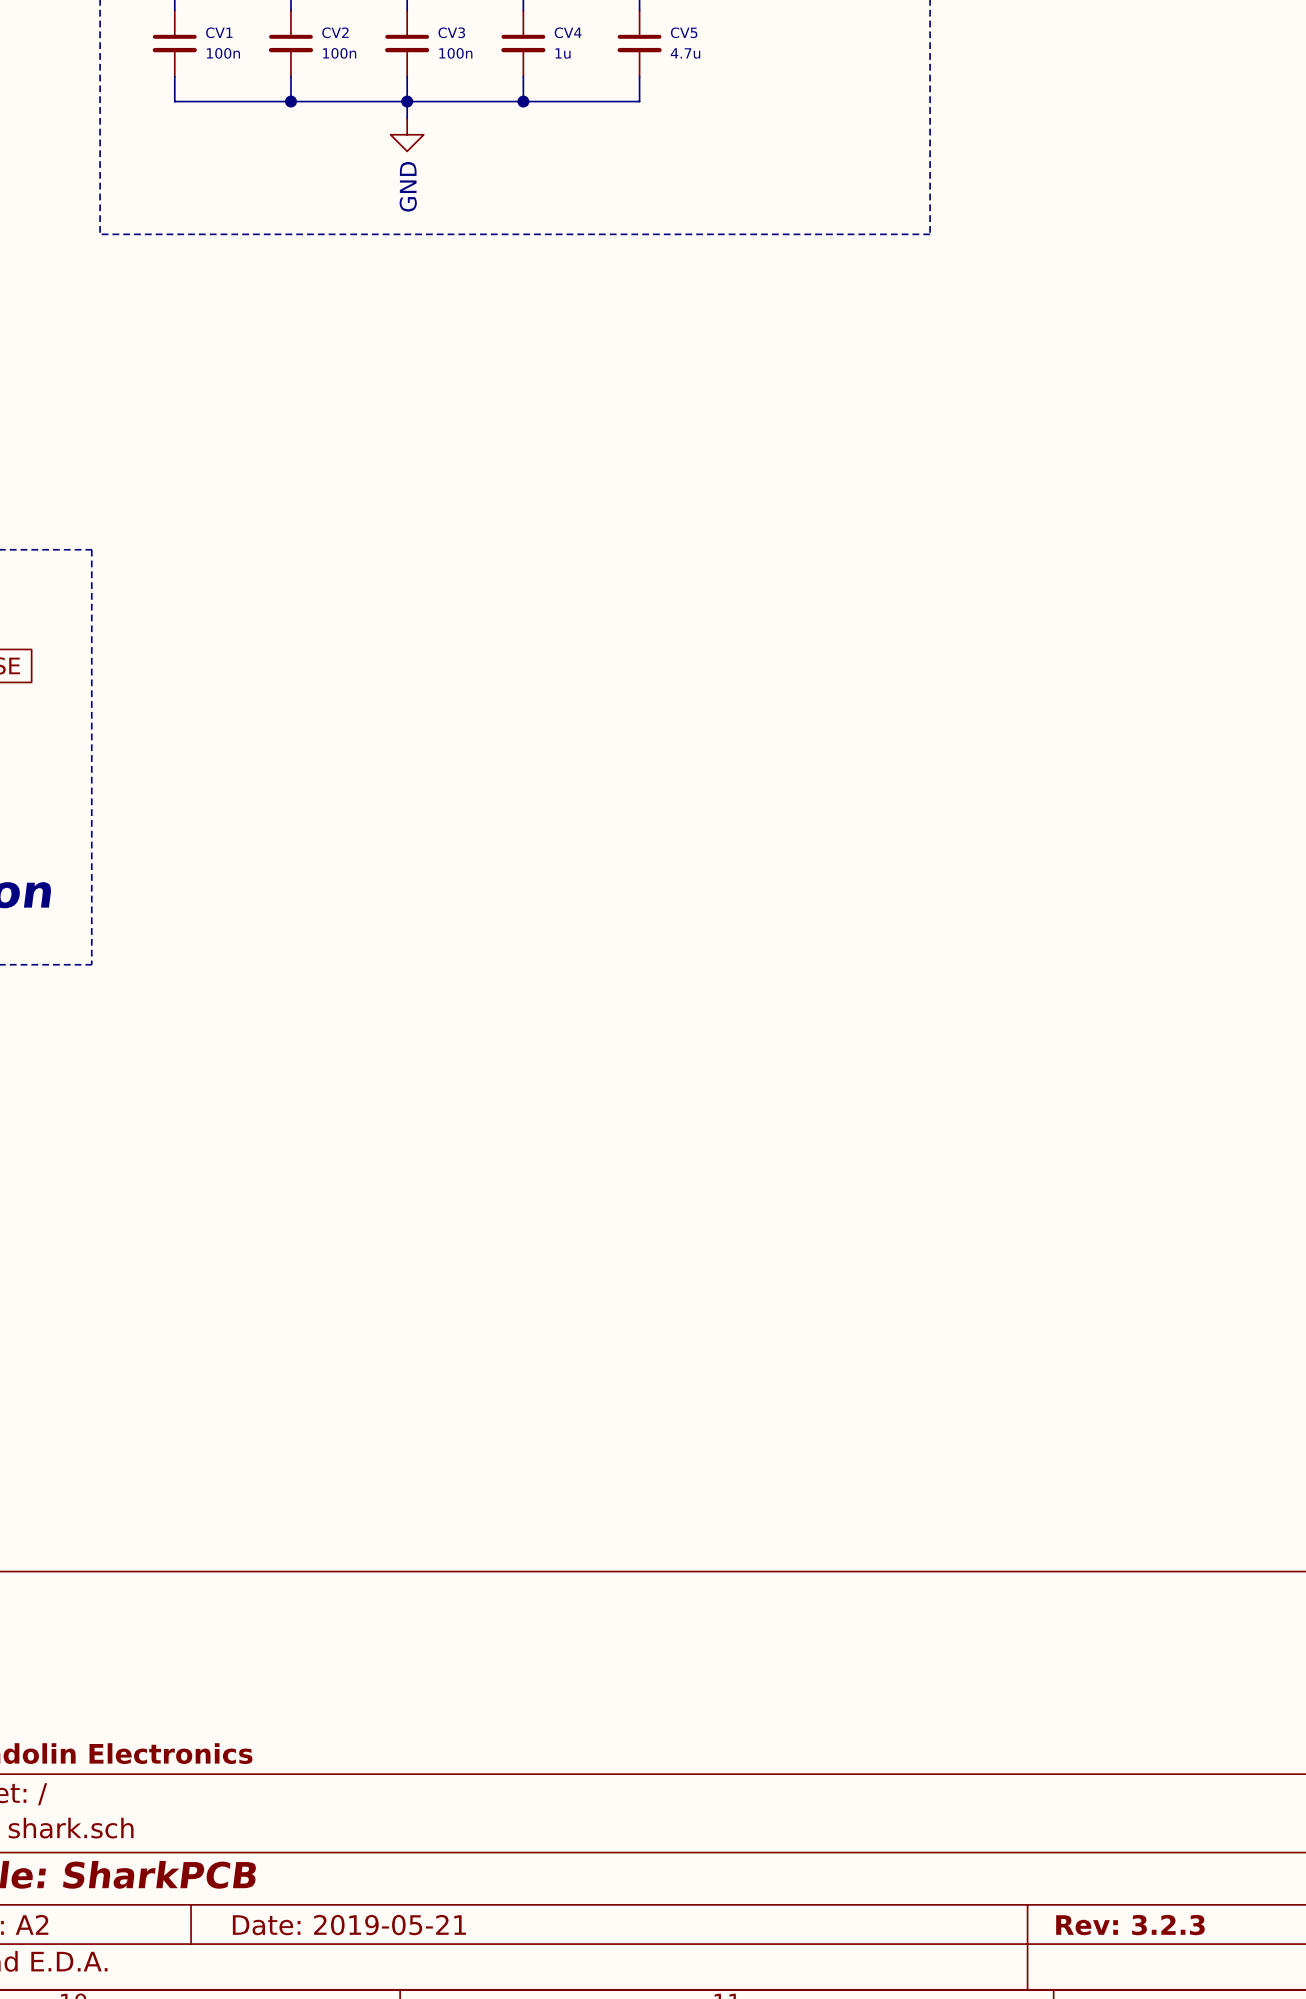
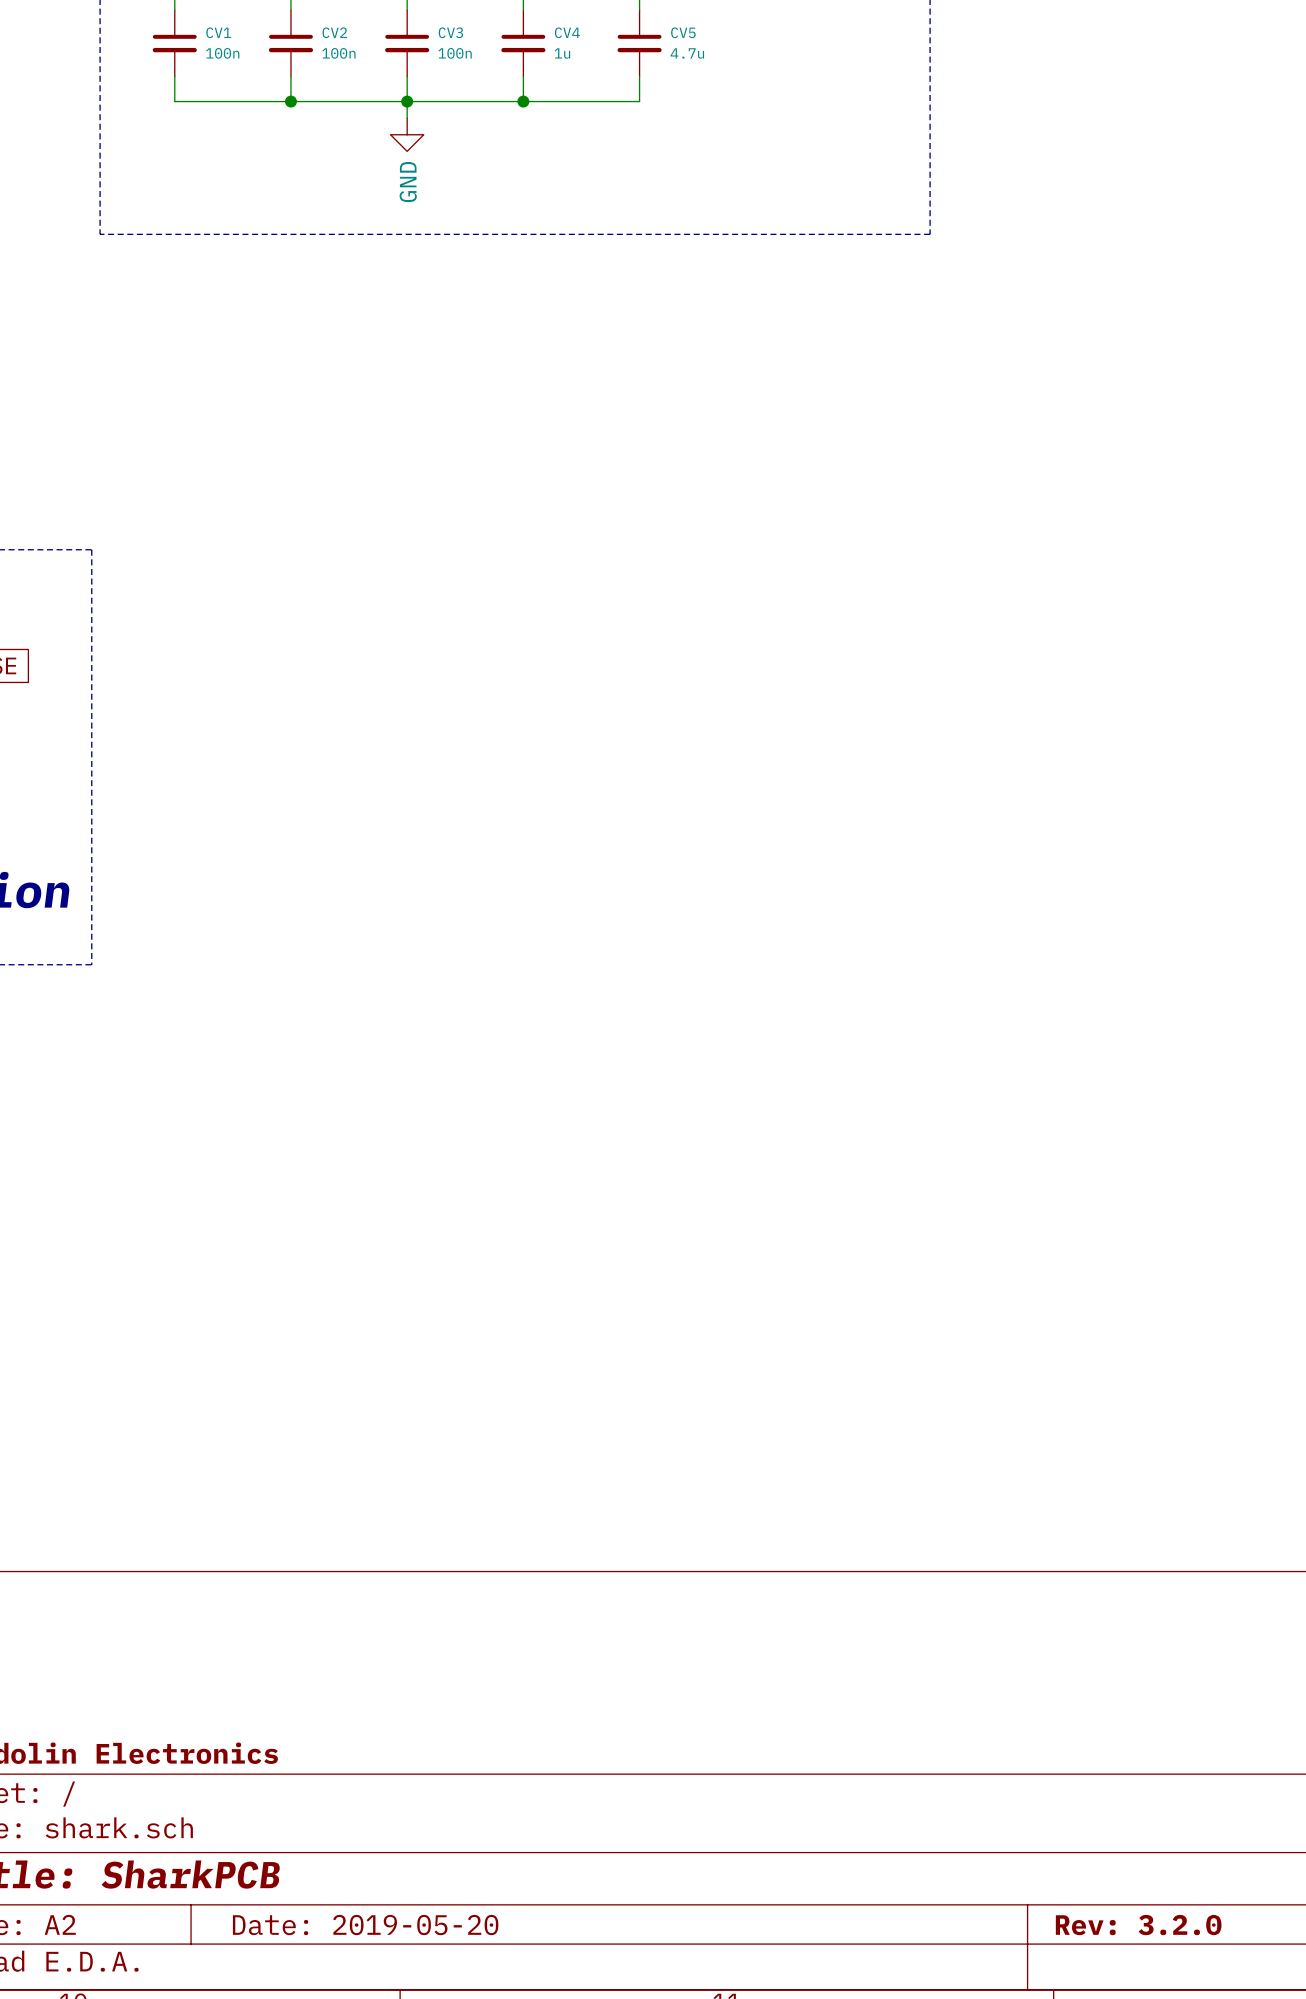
title block: Date: 2019-05-21 (349, 1925) -> Date: 2019-05-20 (365, 1925)
title block: Rev: 3.2.3 (1130, 1925) -> Rev: 3.2.0 (1138, 1925)

